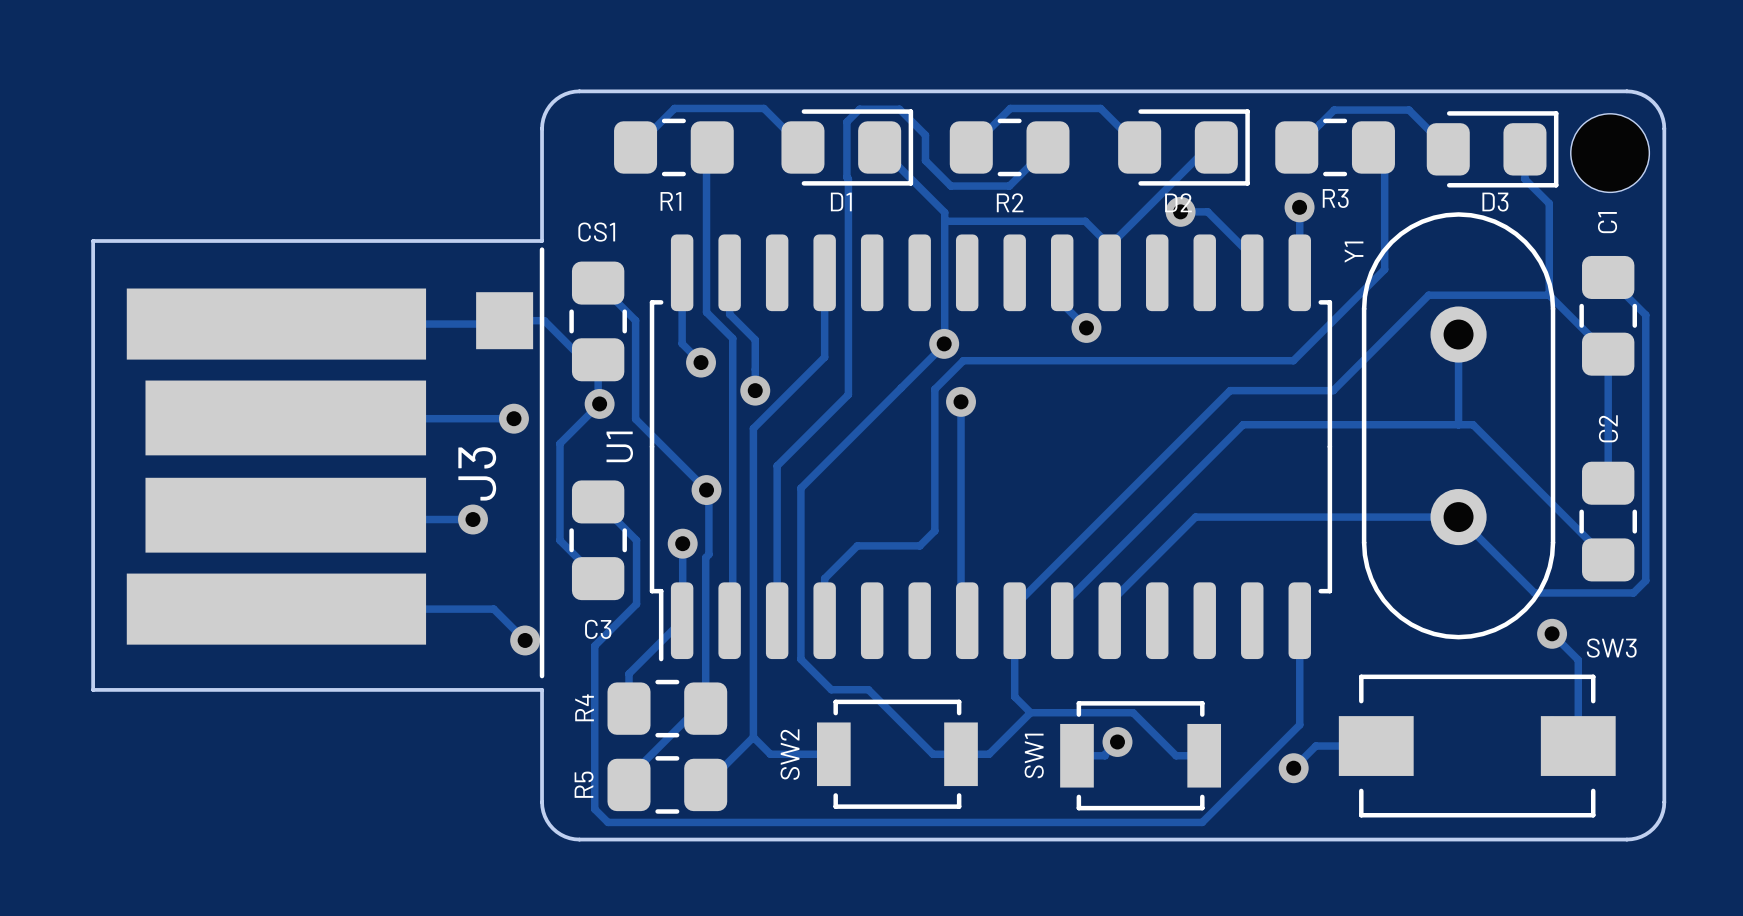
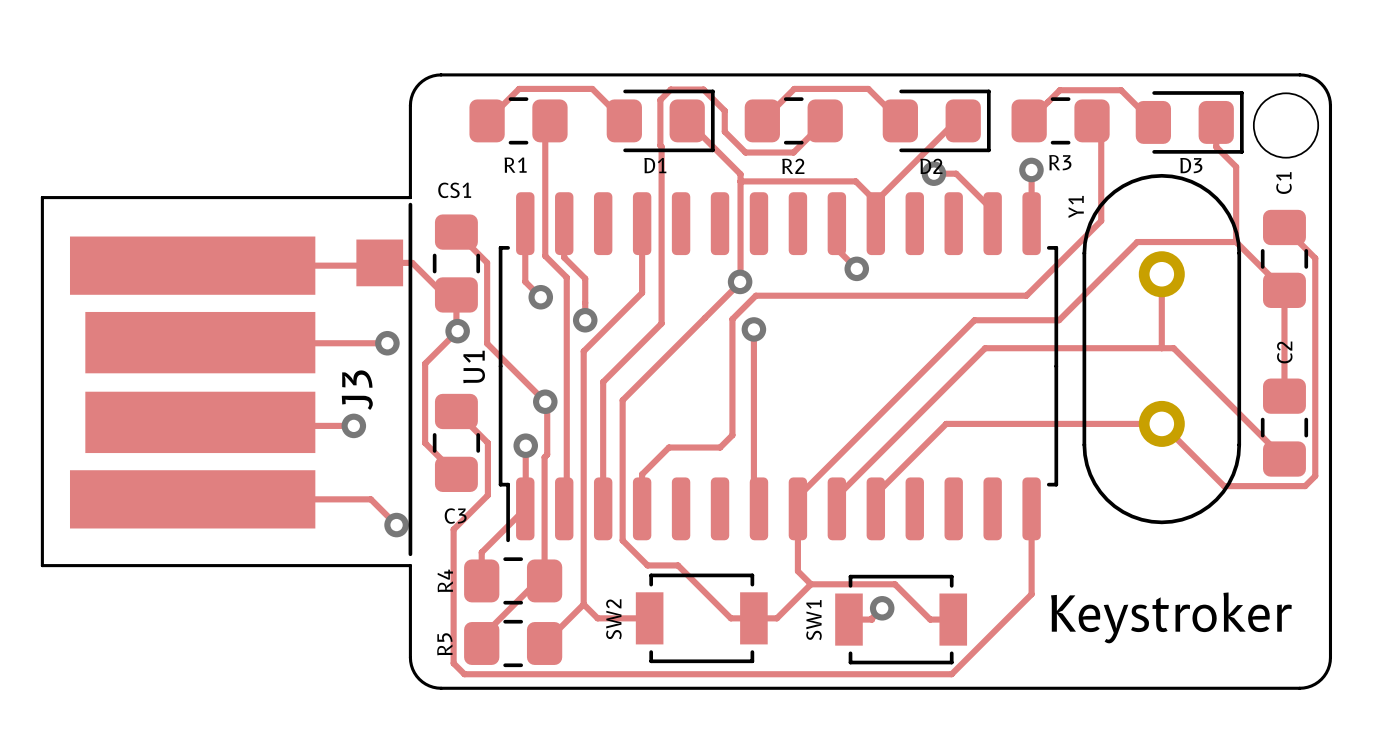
track: (1552, 633) (1578, 659) (1578, 746) -> none
via: (1552, 633) -> none
track: (1376, 746) (1315, 746) (1293, 768) -> none
SW3: (1477, 746) -> none
text: none -> Keystroker (1171, 617)
via: (1293, 768) -> none

